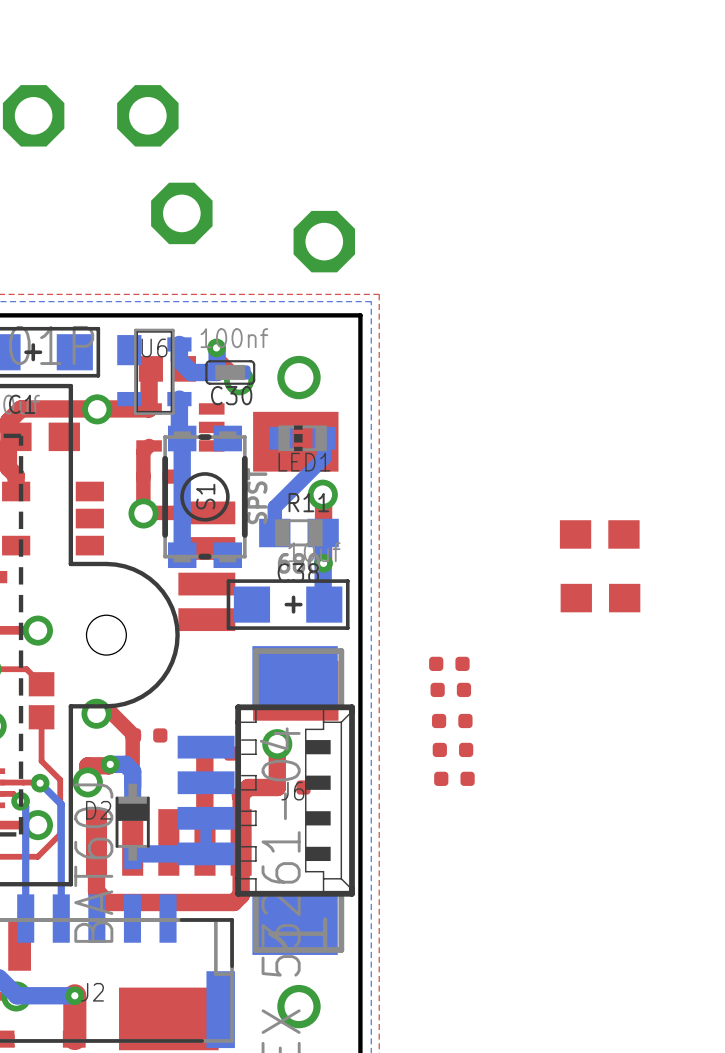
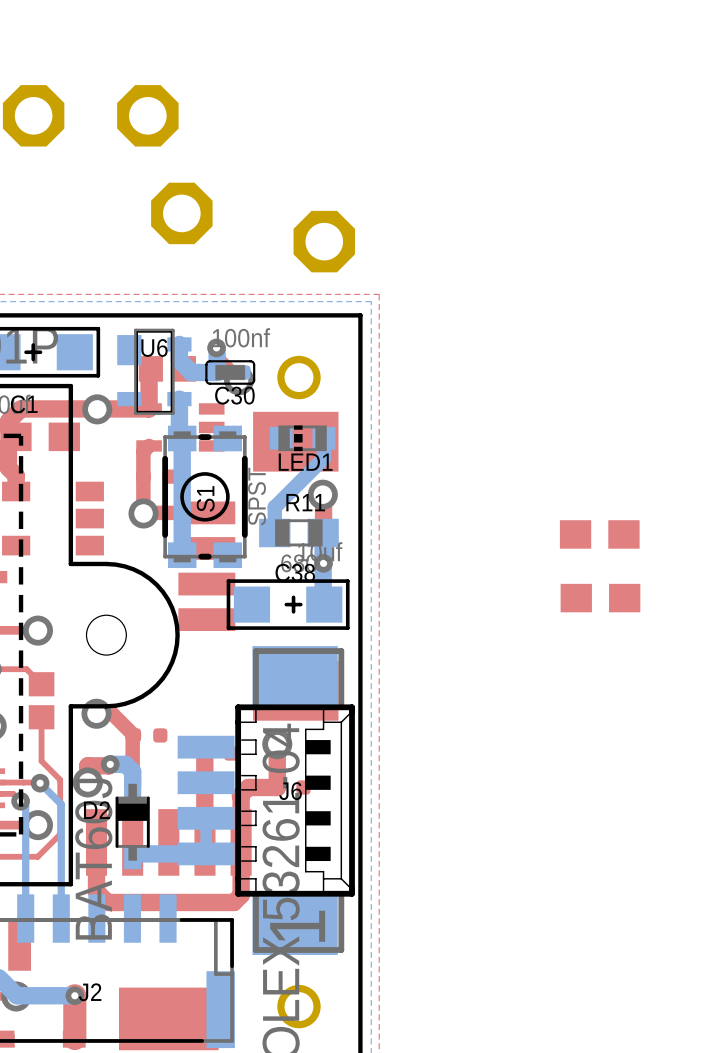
part: (449, 663) -> none
part: (450, 689) -> none
part: (452, 721) -> none
part: (452, 749) -> none
part: (454, 778) -> none

